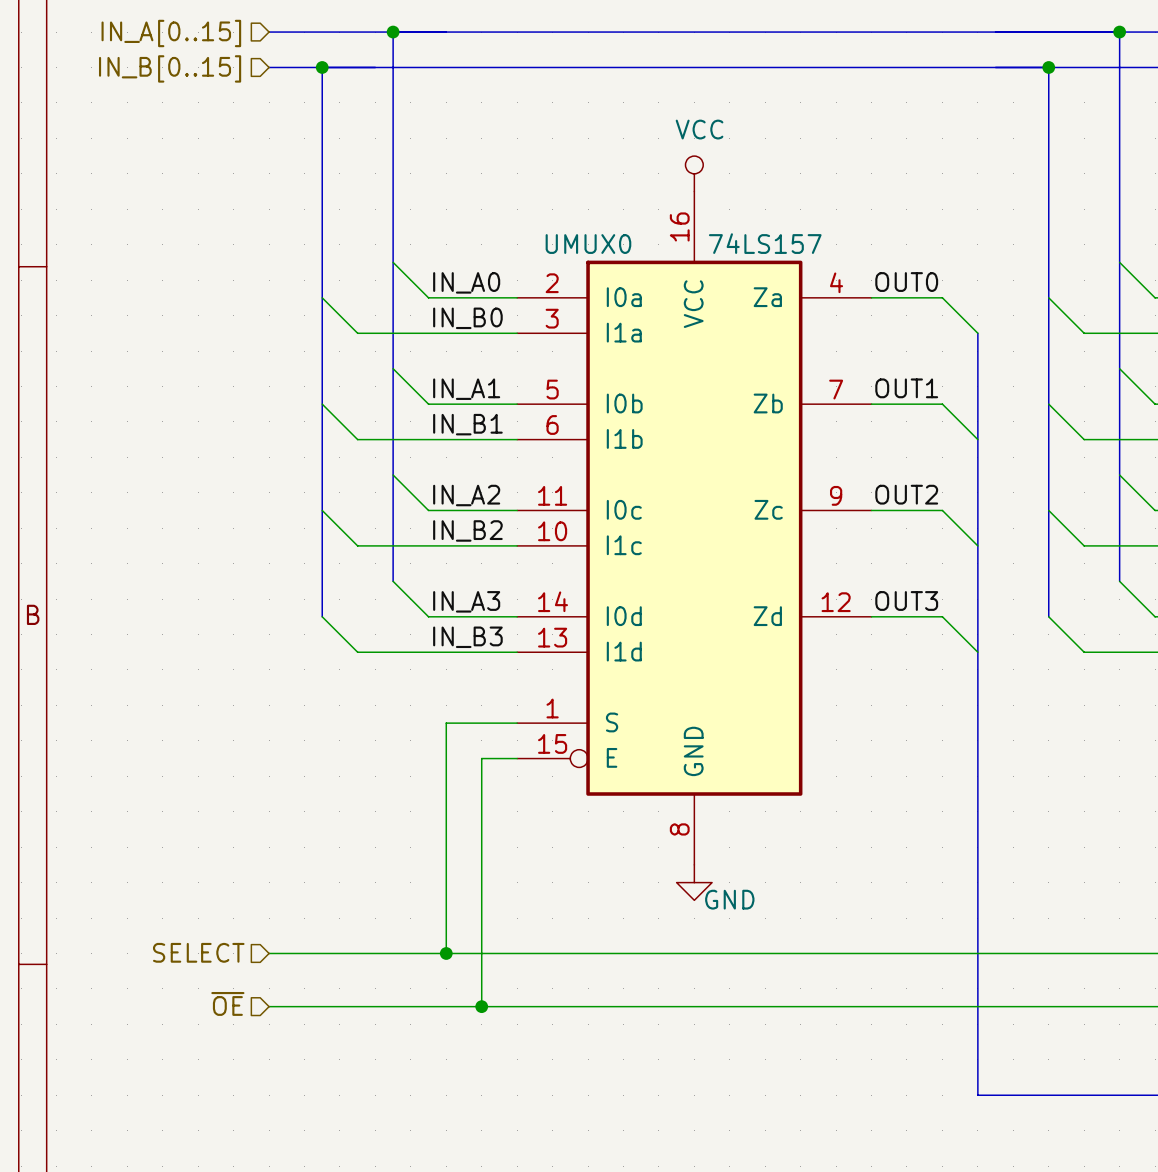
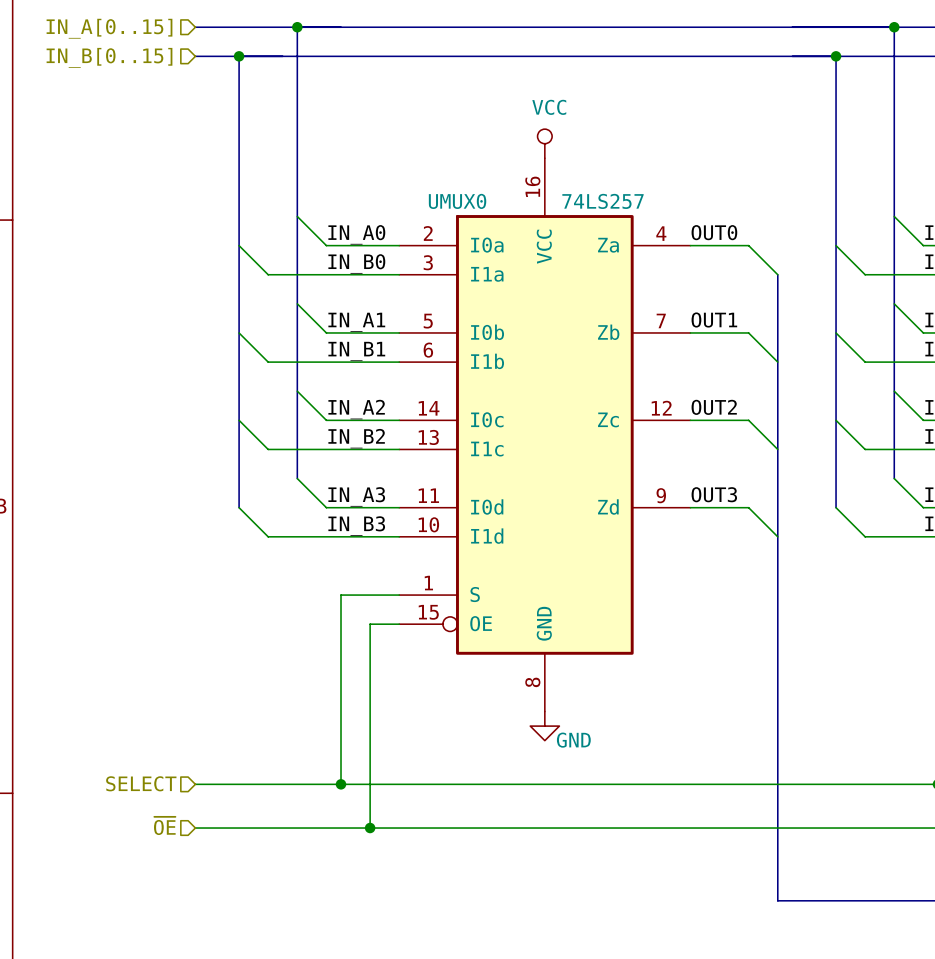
UMUX0 value: 74LS157 (765, 243) -> 74LS257 (603, 201)
UMUX0 pin number: 11 (552, 495) -> 14 (429, 408)
UMUX0 pin number: 9 (836, 495) -> 12 (661, 408)
UMUX0 pin number: 10 (552, 531) -> 13 (428, 437)
UMUX0 pin number: 14 (553, 601) -> 11 (428, 495)
UMUX0 pin number: 12 (836, 602) -> 9 (661, 495)
UMUX0 pin number: 13 (552, 637) -> 10 (428, 524)
UMUX0 pin name: E (612, 757) -> OE (481, 623)

